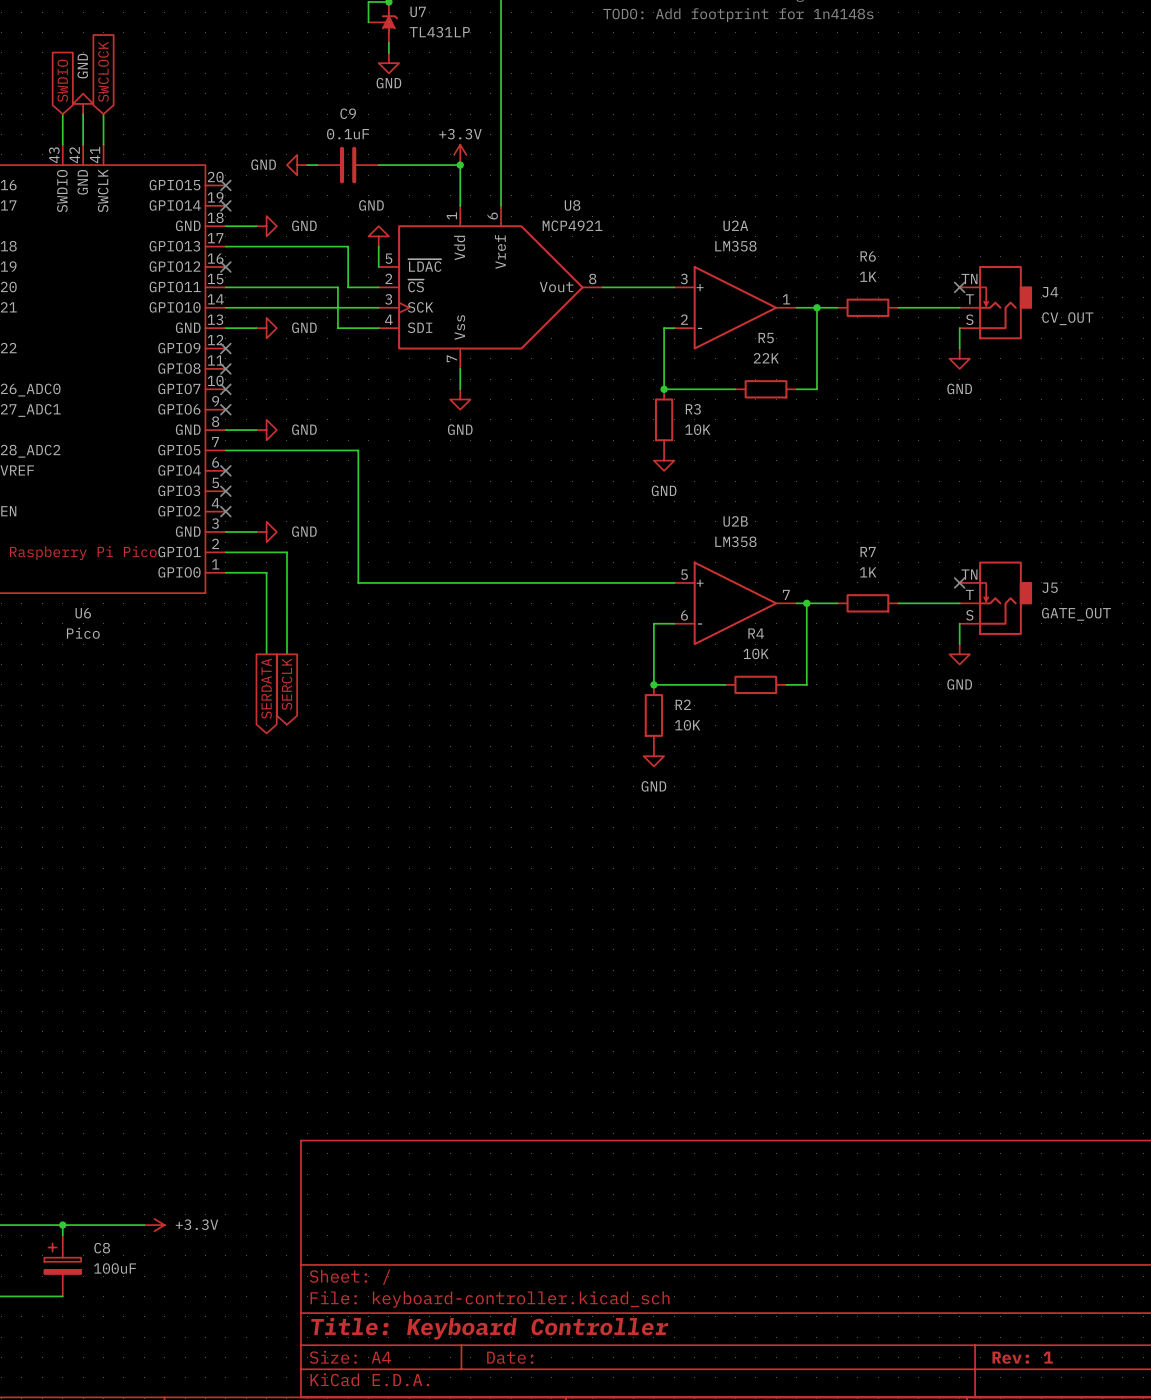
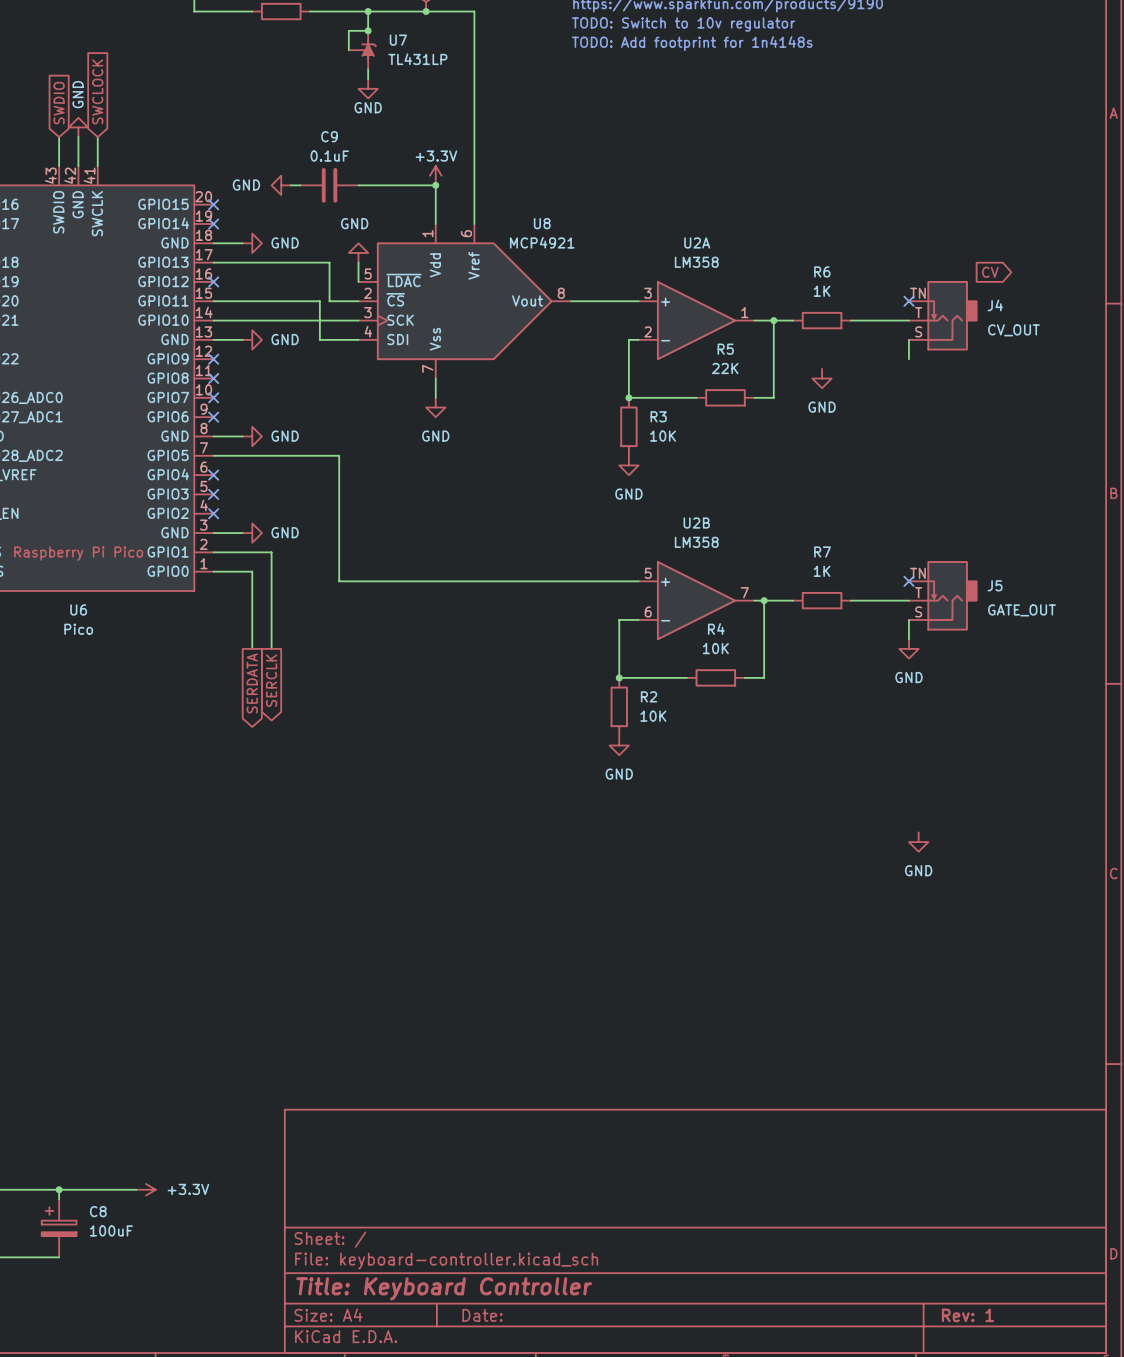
global label: none -> CV (990, 272)
power symbol position: GND (959, 358) -> GND (822, 378)
power symbol: none -> GND (918, 842)

